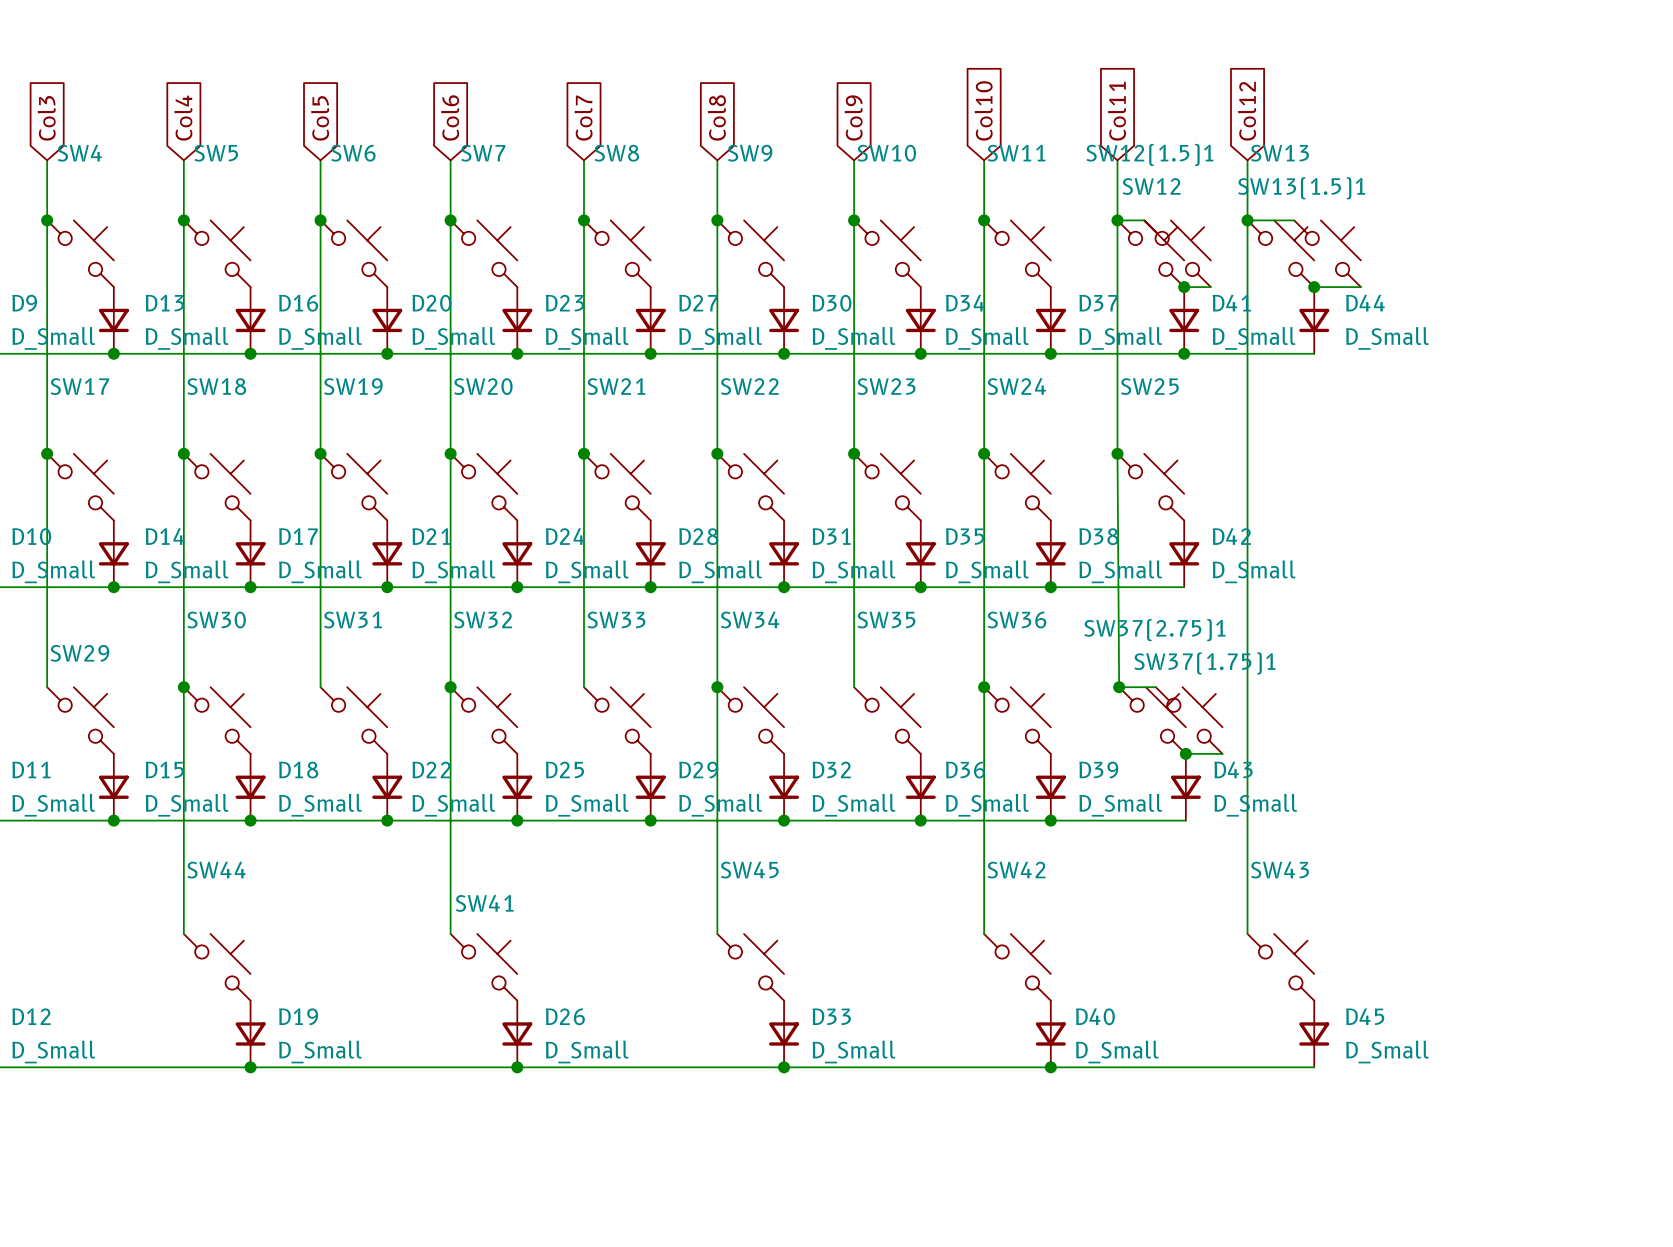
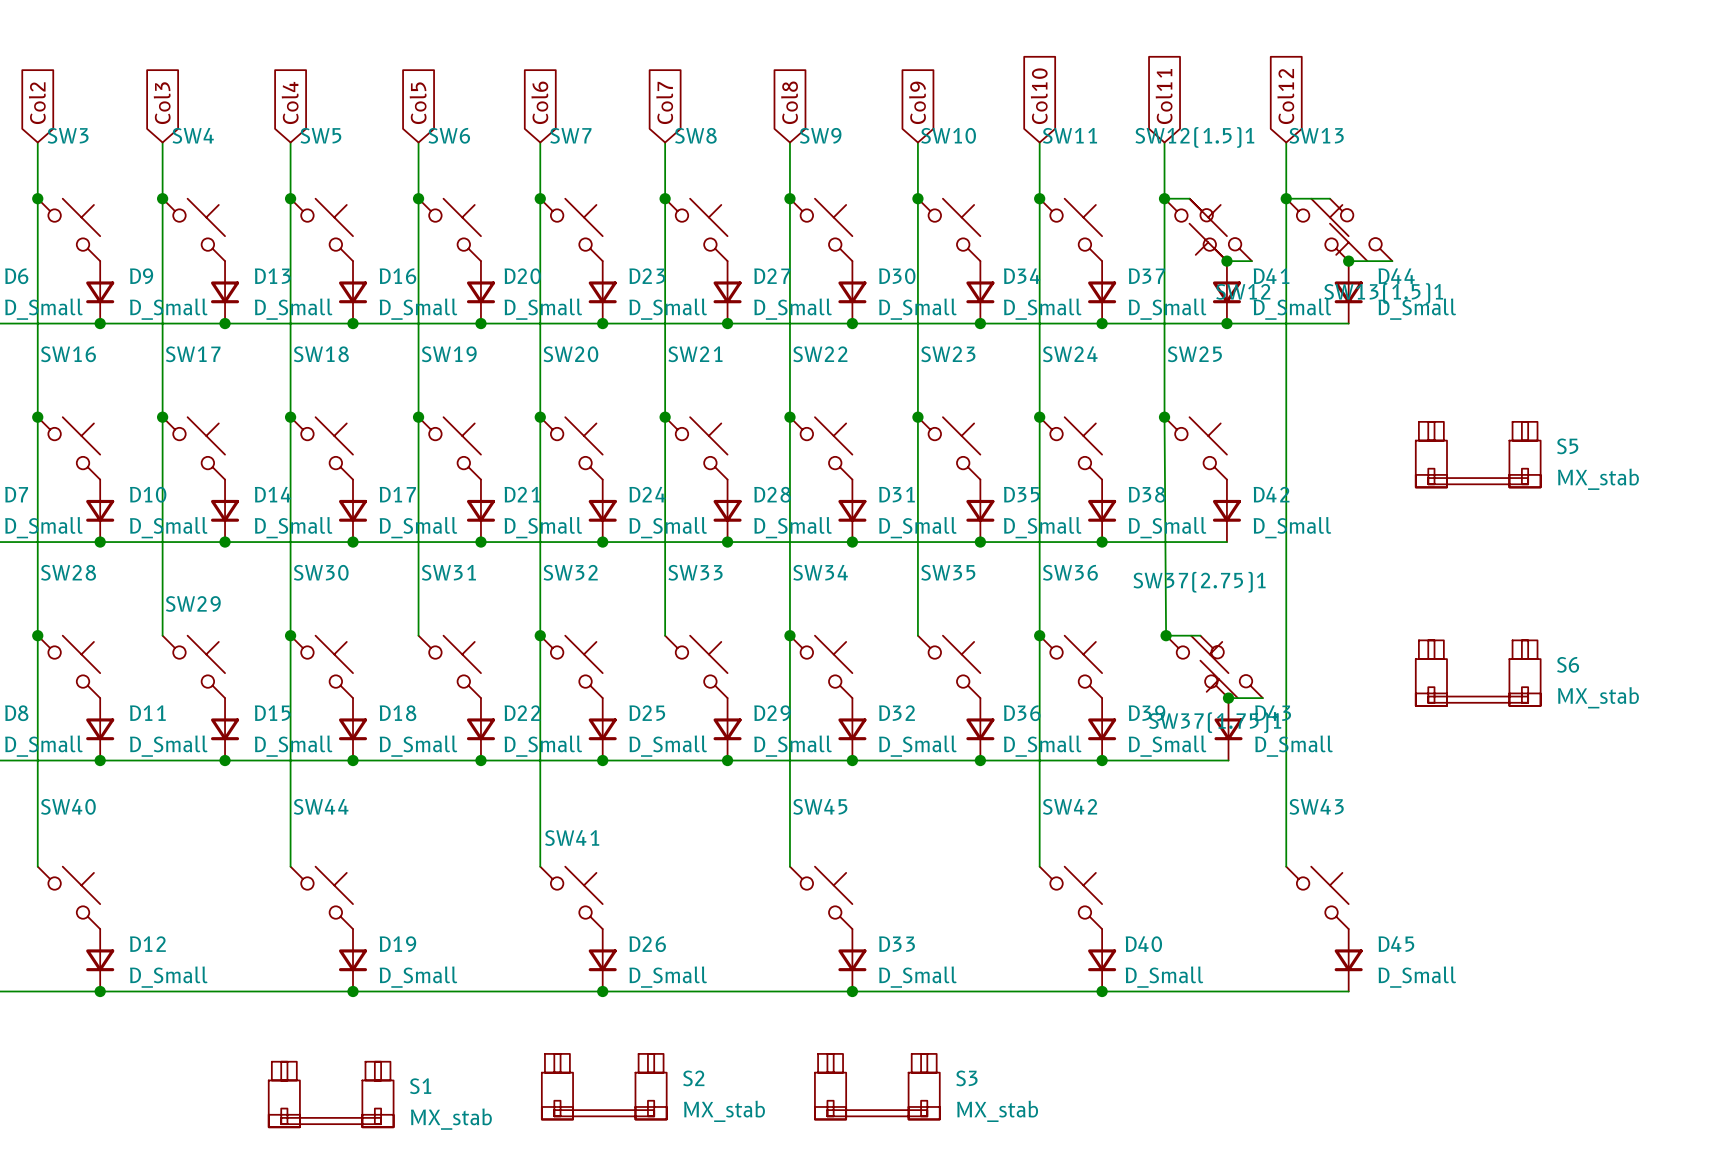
SW12 rotation: 0° (1177, 253) -> 180° (1220, 229)
SW13(1.5)1 rotation: 0° (1327, 253) -> 180° (1361, 229)
S5: none -> MX_stab (1478, 454)
SW37(1.75)1 rotation: 0° (1189, 720) -> 180° (1231, 666)
S6: none -> MX_stab (1478, 673)
S2: none -> MX_stab (604, 1086)
S3: none -> MX_stab (877, 1086)
S1: none -> MX_stab (331, 1094)

